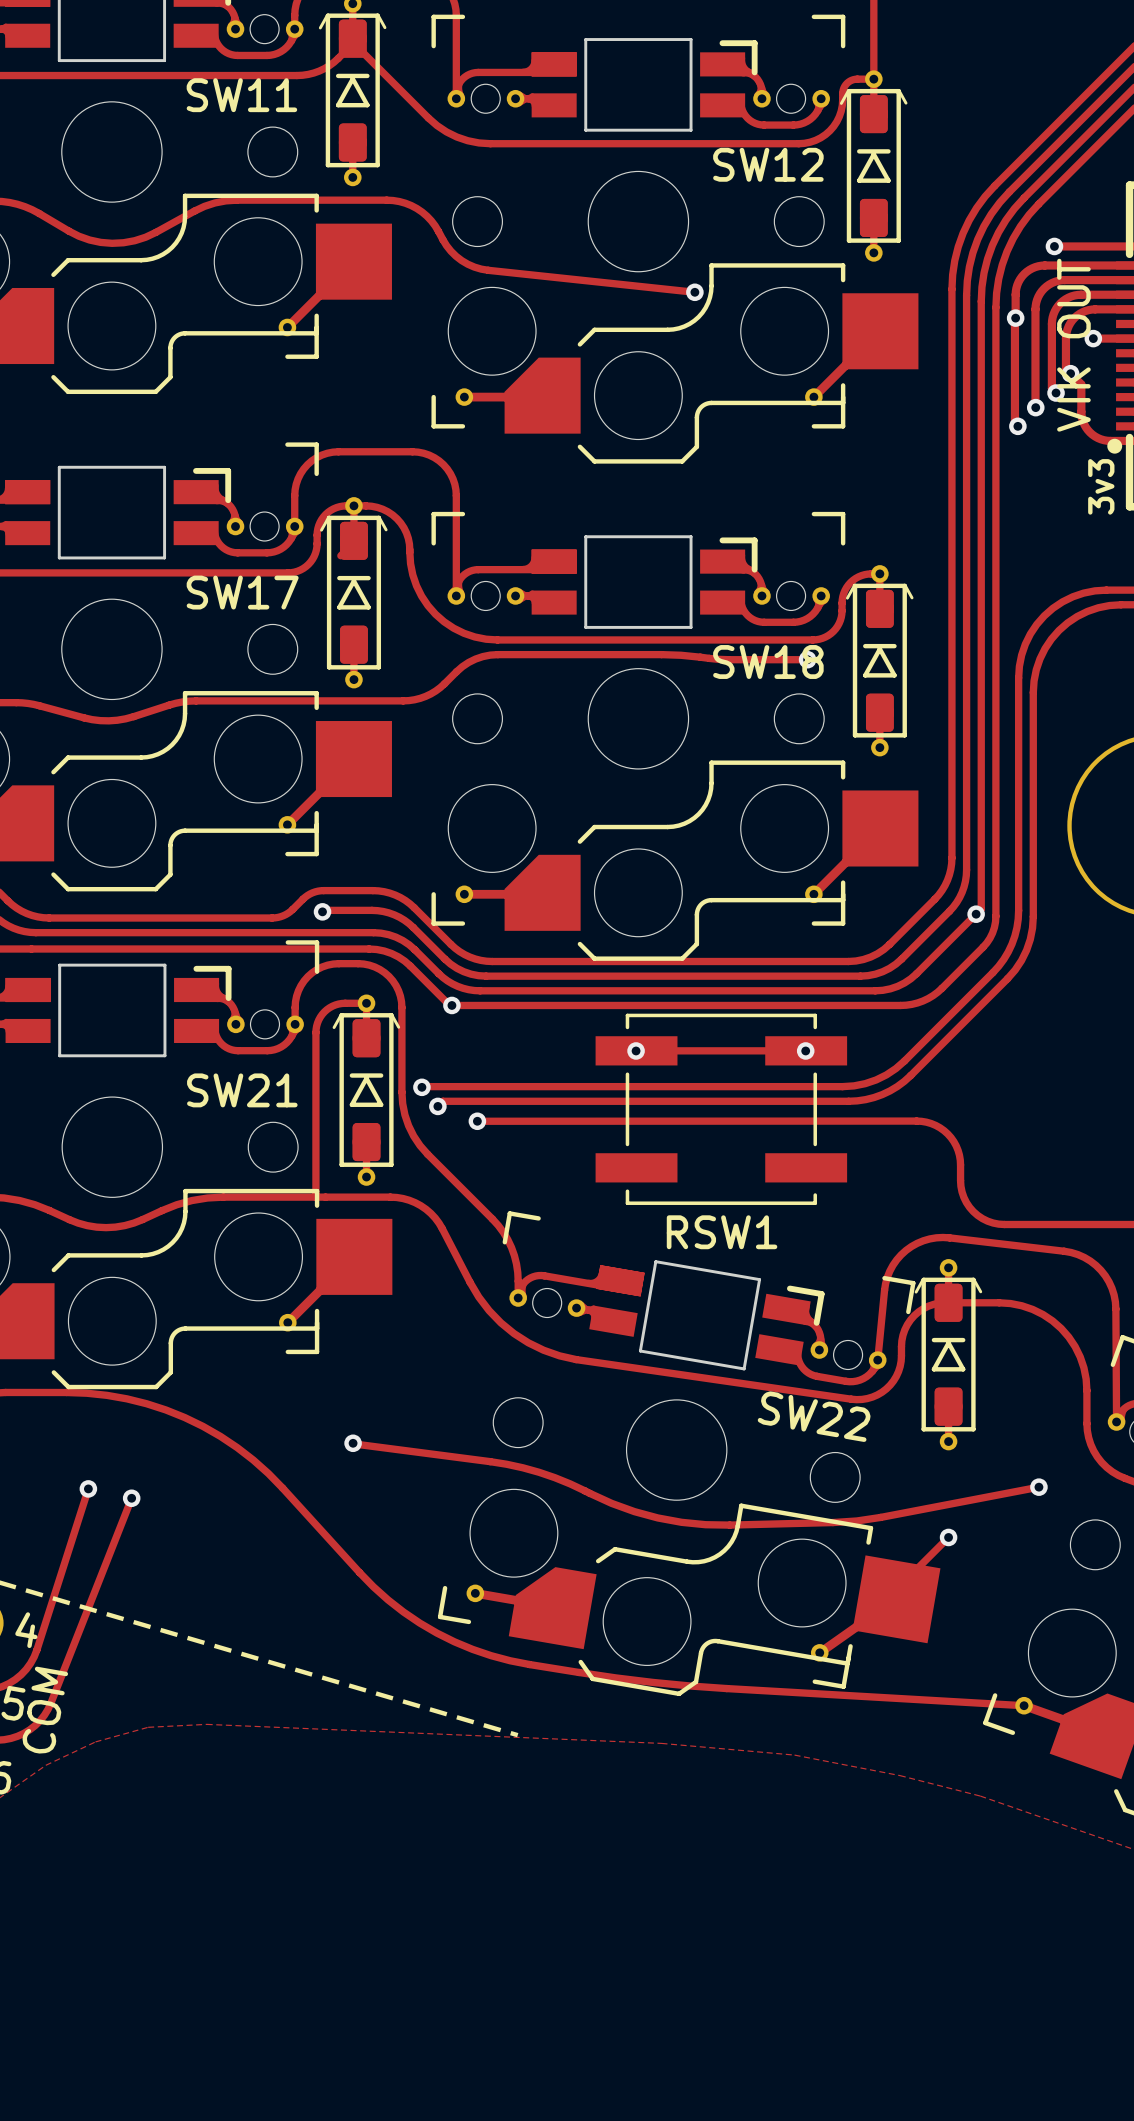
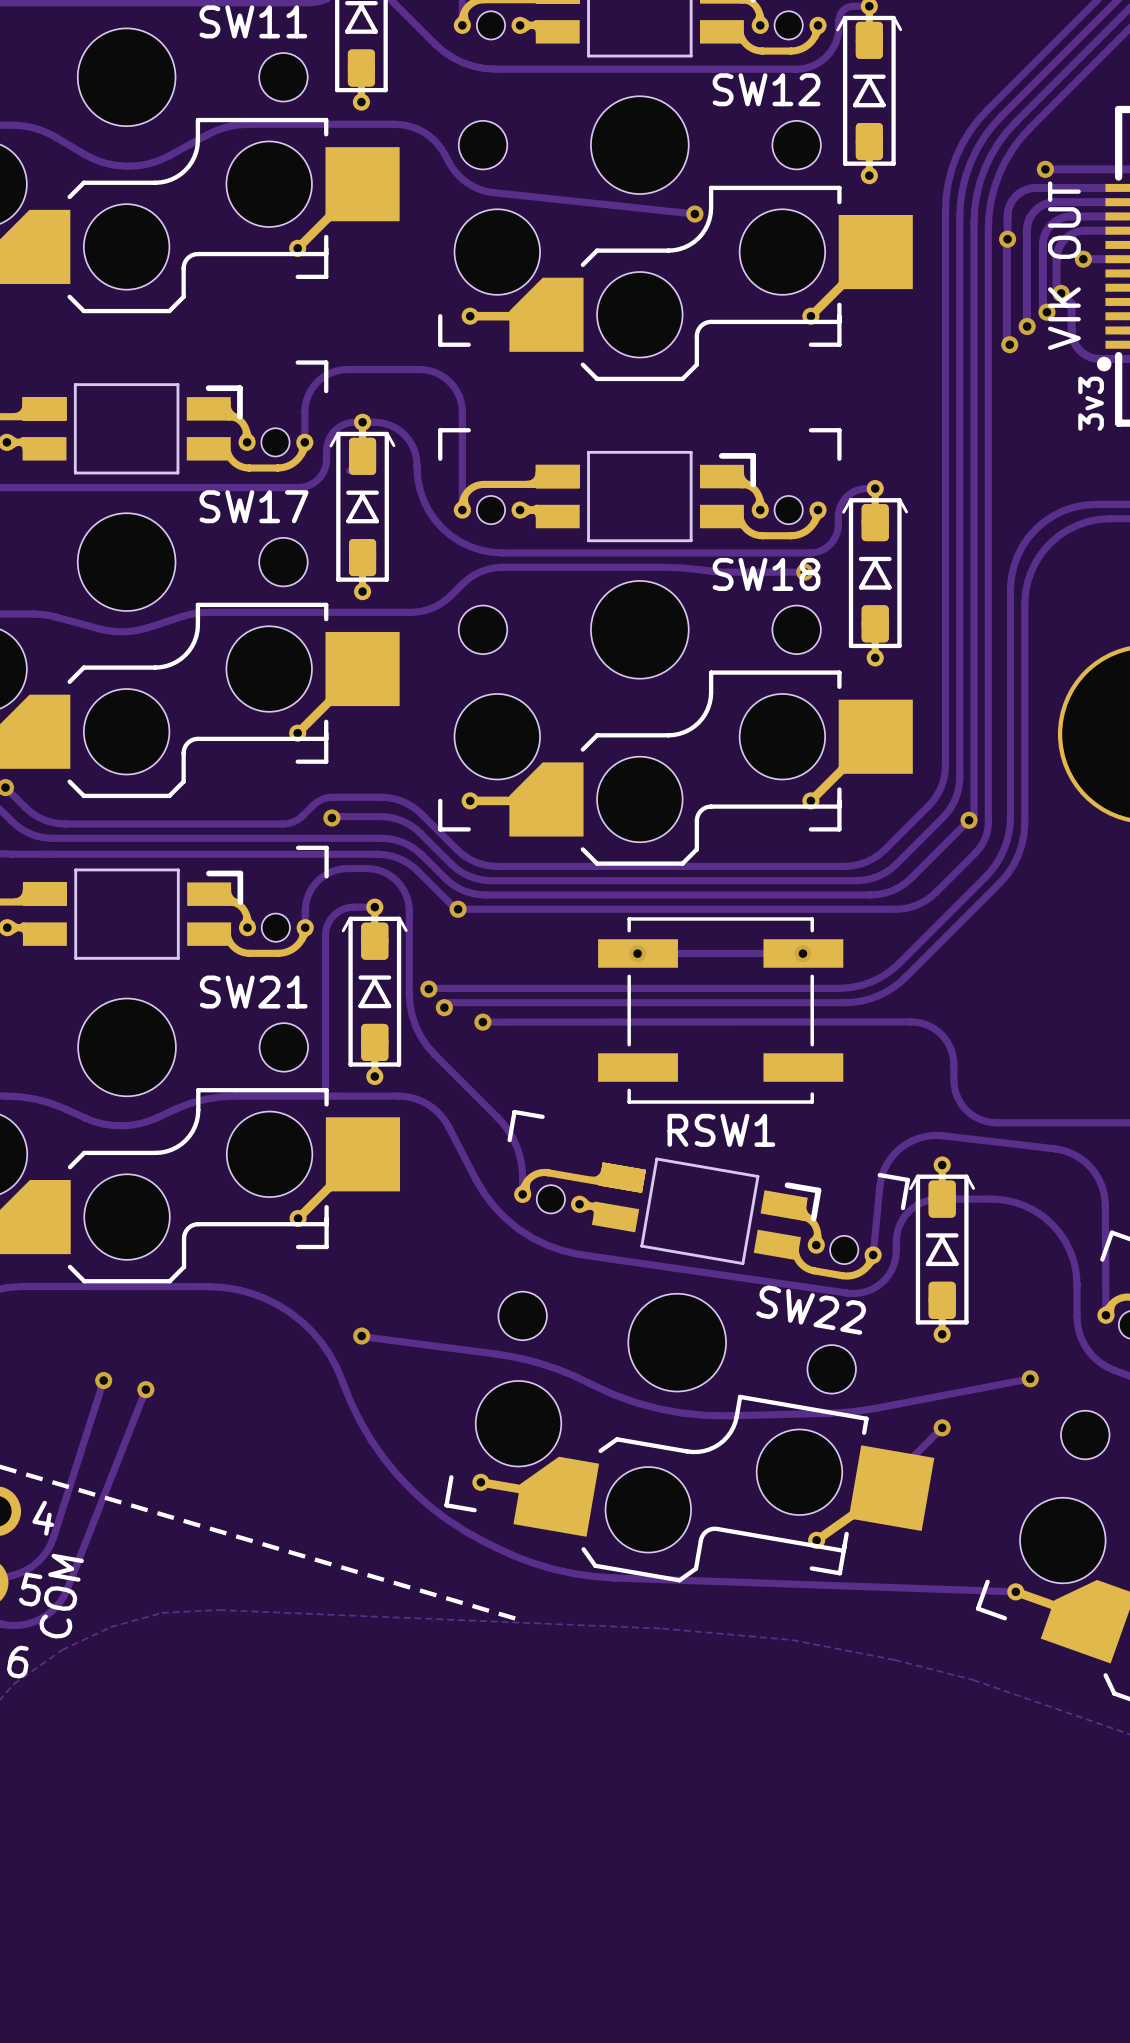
track: (66, 1392) (106, 1395) (146, 1403) (184, 1417) (220, 1436) (268, 1473) (359, 1572) (388, 1599) (436, 1633) (491, 1655) (579, 1672) (689, 1685) (1024, 1705) -> (82, 1286) (222, 1287) (251, 1293) (278, 1304) (301, 1321) (321, 1342) (336, 1367) (350, 1402) (371, 1440) (384, 1458) (413, 1491) (446, 1519) (464, 1531) (496, 1548) (534, 1563) (574, 1573) (614, 1577) (1015, 1591)

